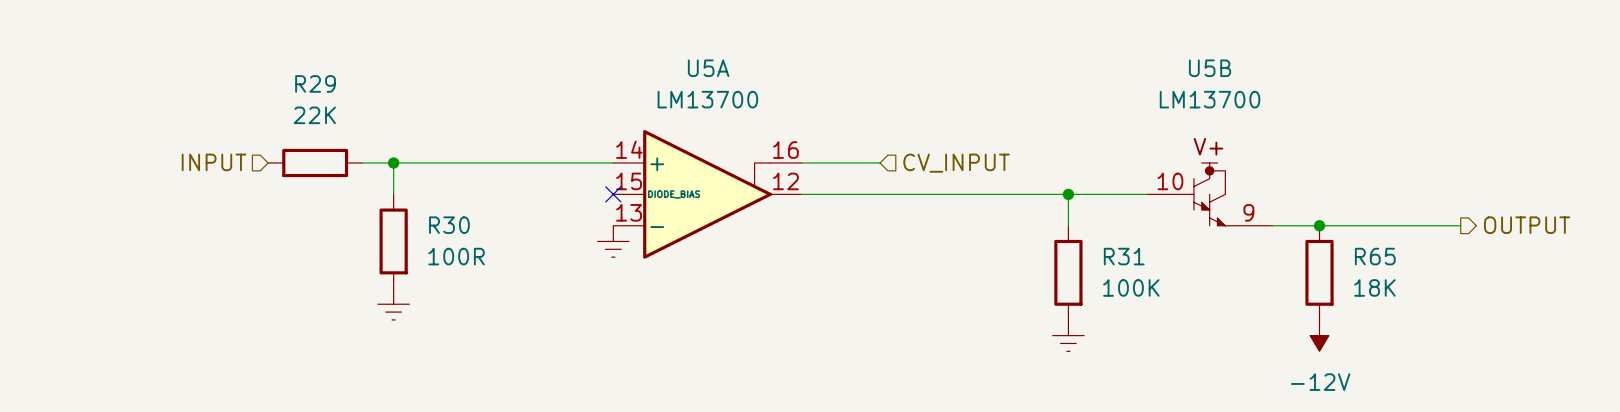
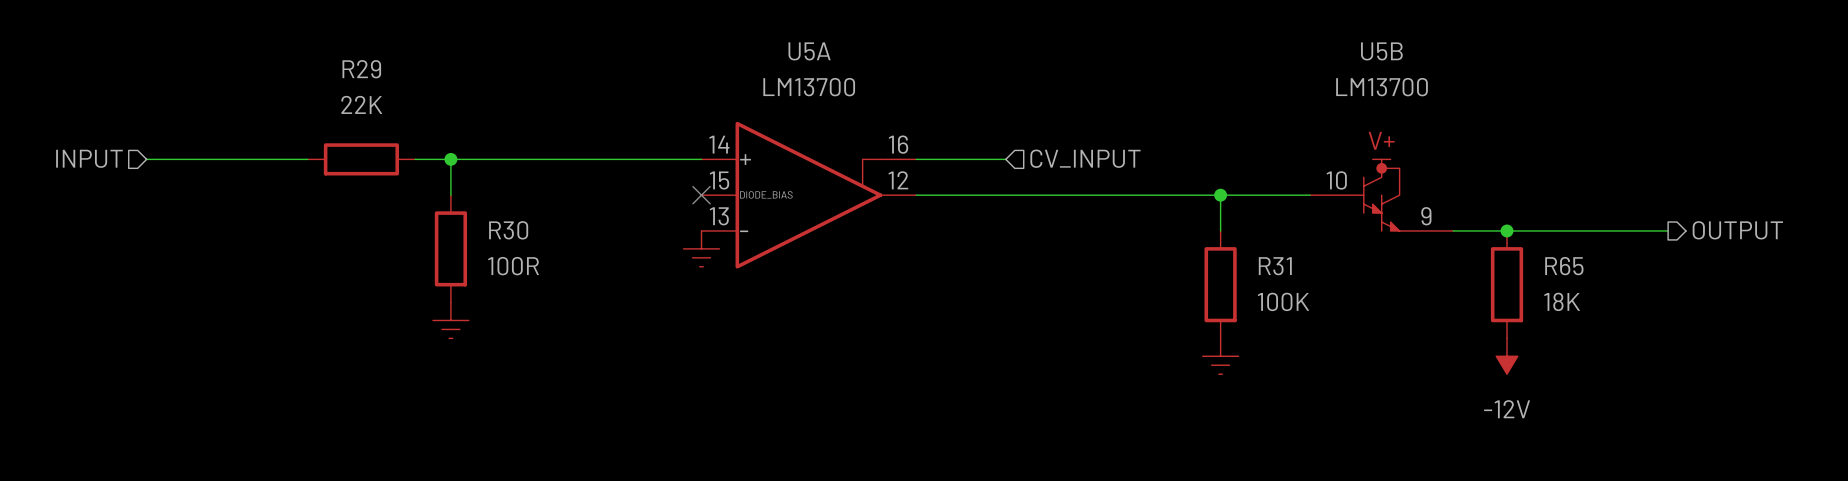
wire: none -> (146, 159) (307, 159)
hierarchical label position: INPUT (214, 162) -> INPUT (89, 158)

